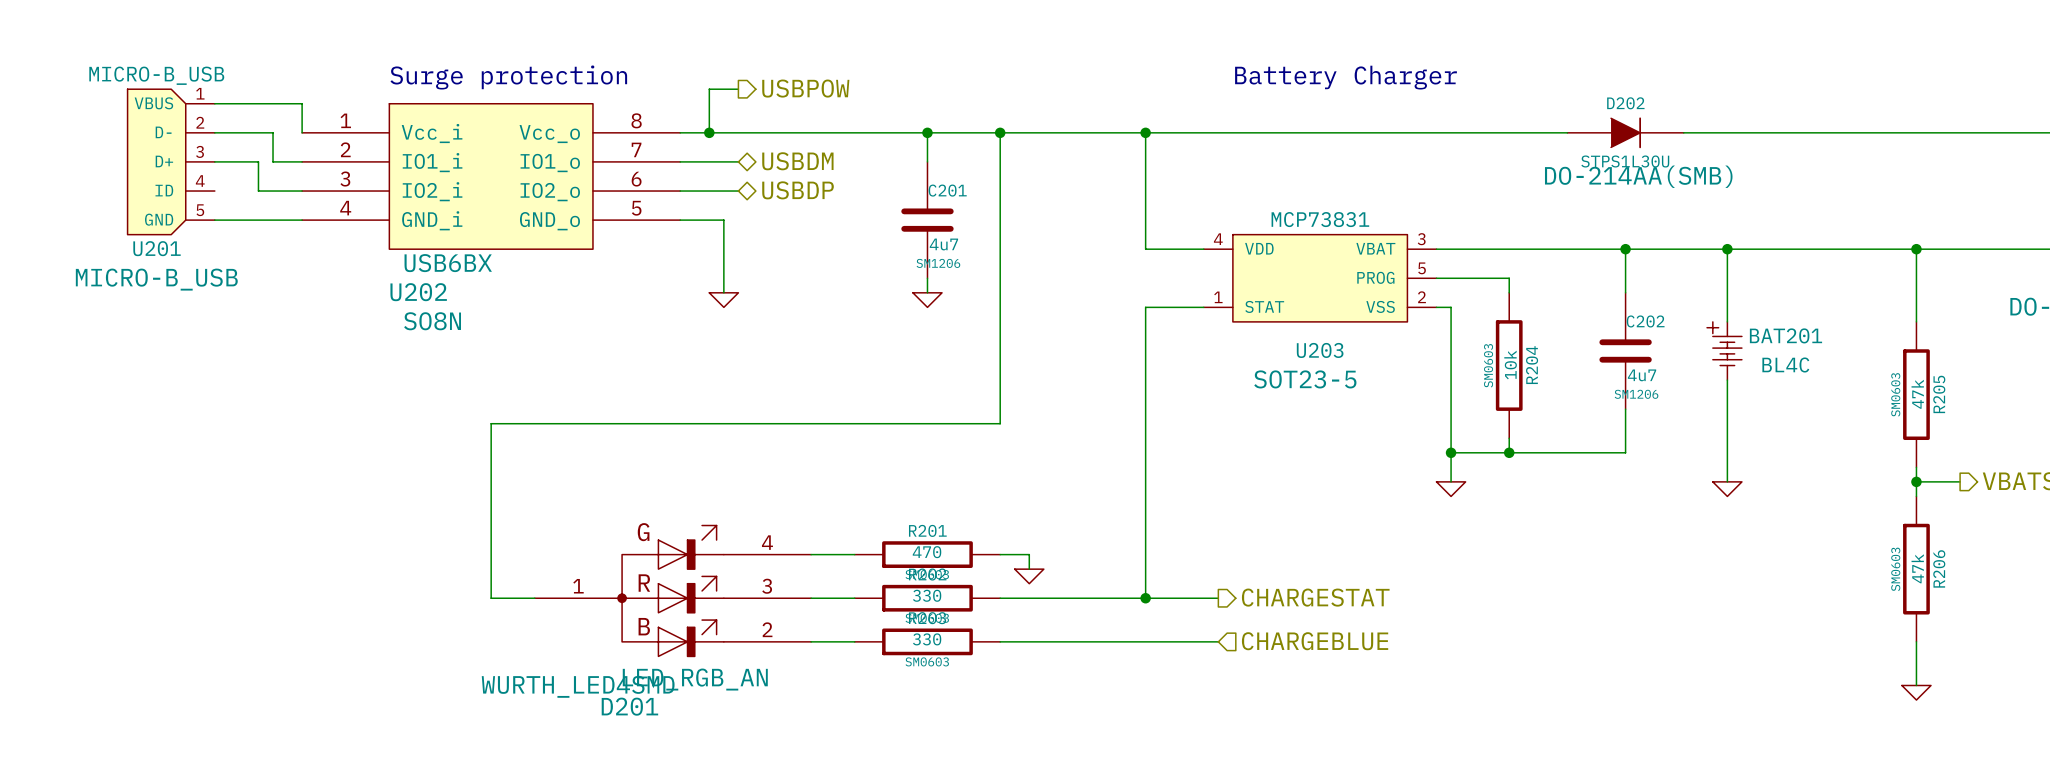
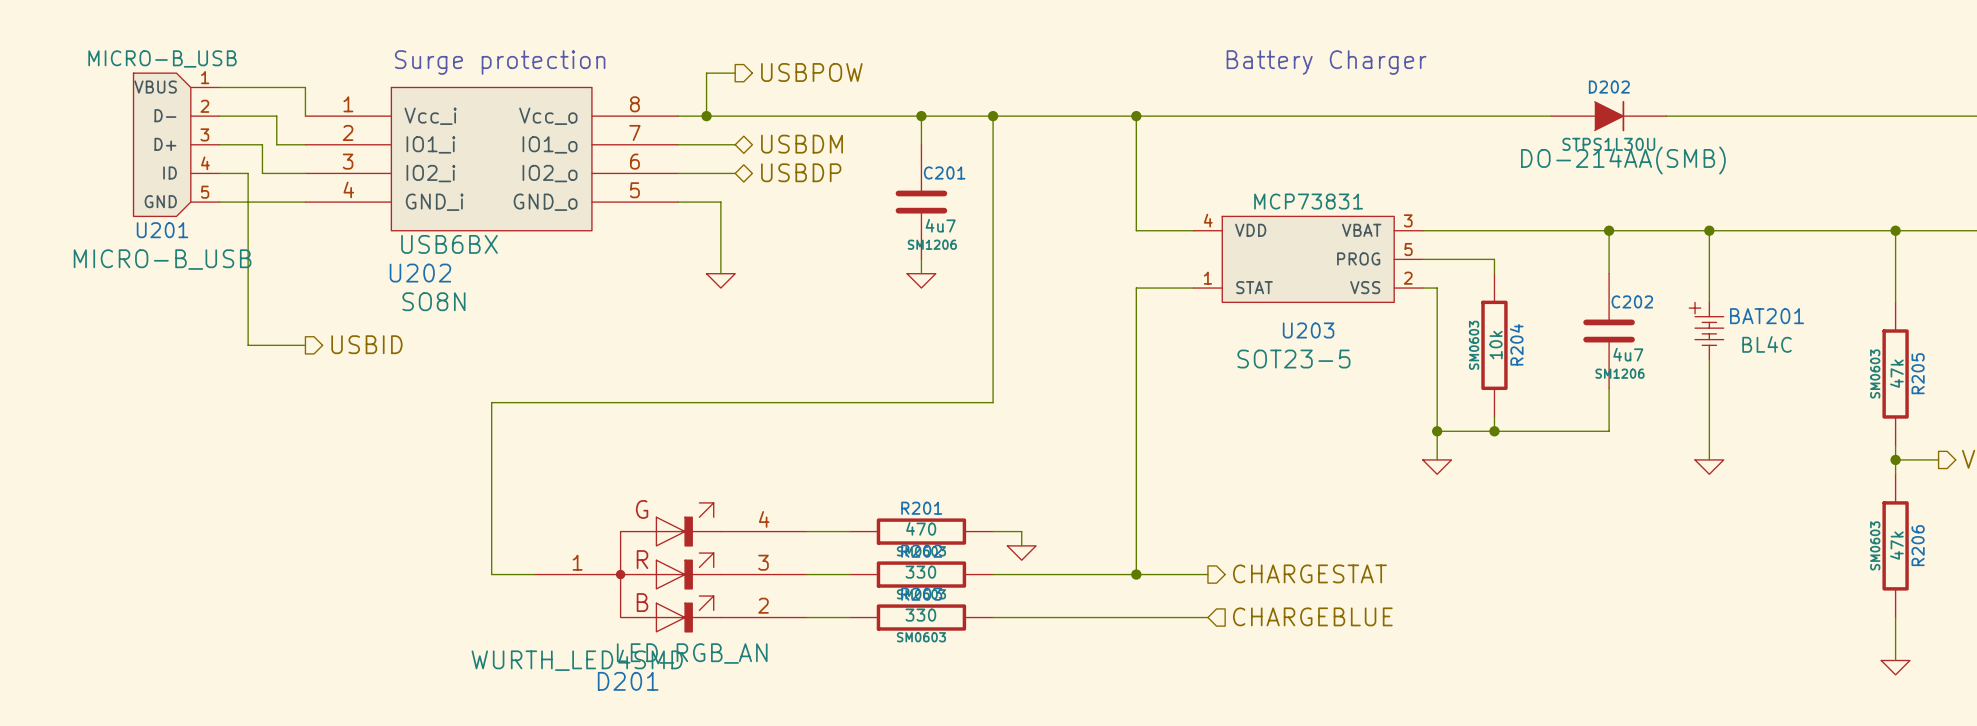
wire: none -> (219, 173) (248, 173) (248, 345) (305, 345)
hierarchical label: none -> USBID (366, 344)

